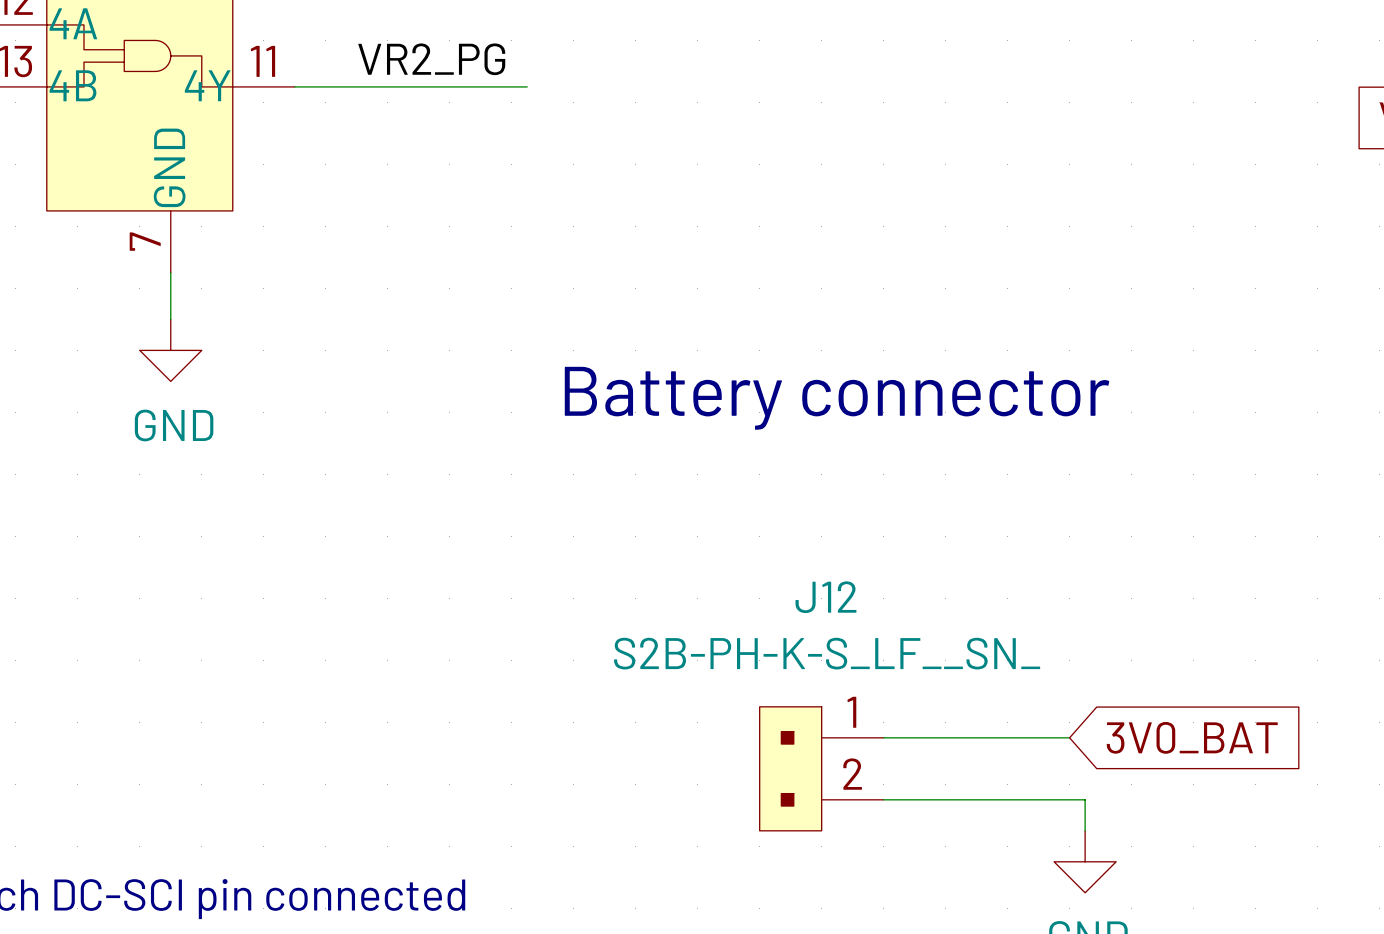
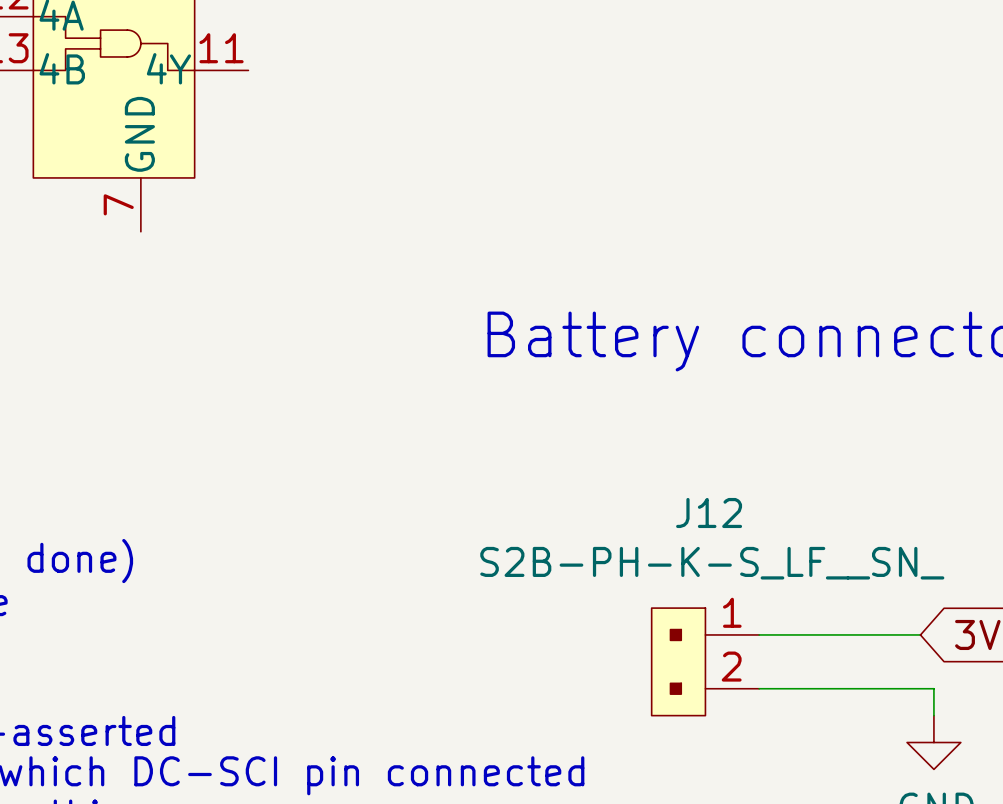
label: VR2_PG (431, 59) -> none
wire: (294, 86) (527, 86) -> none
wire: (170, 272) (170, 319) -> none
power symbol: GND (170, 350) -> none

